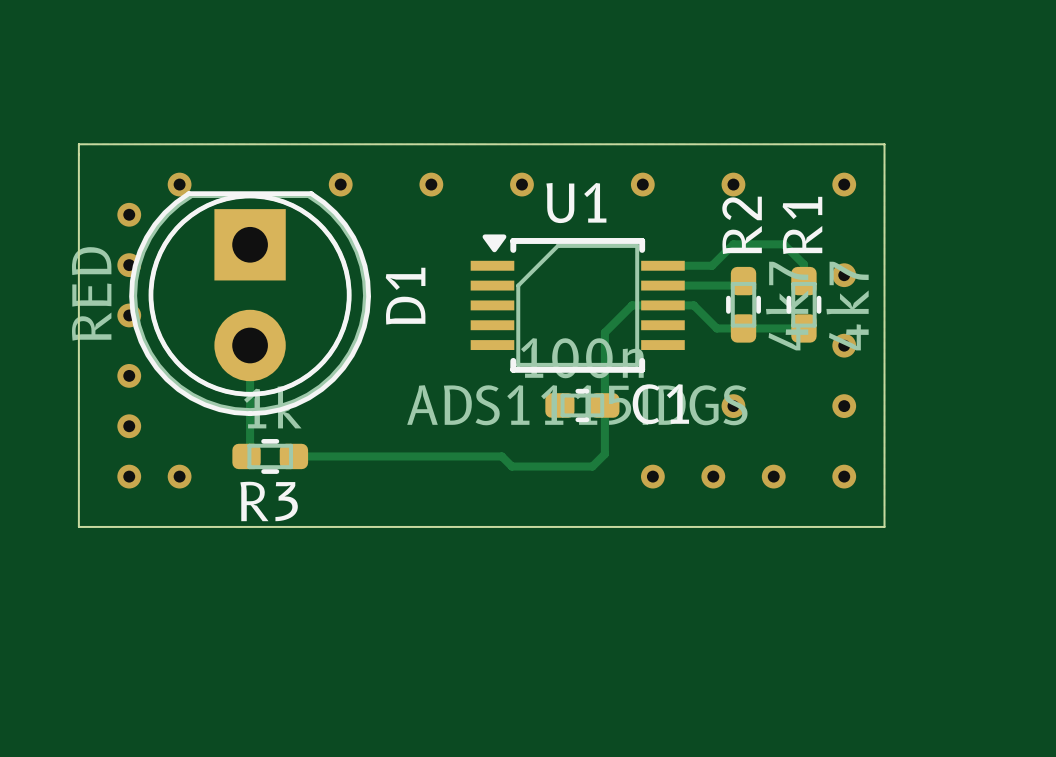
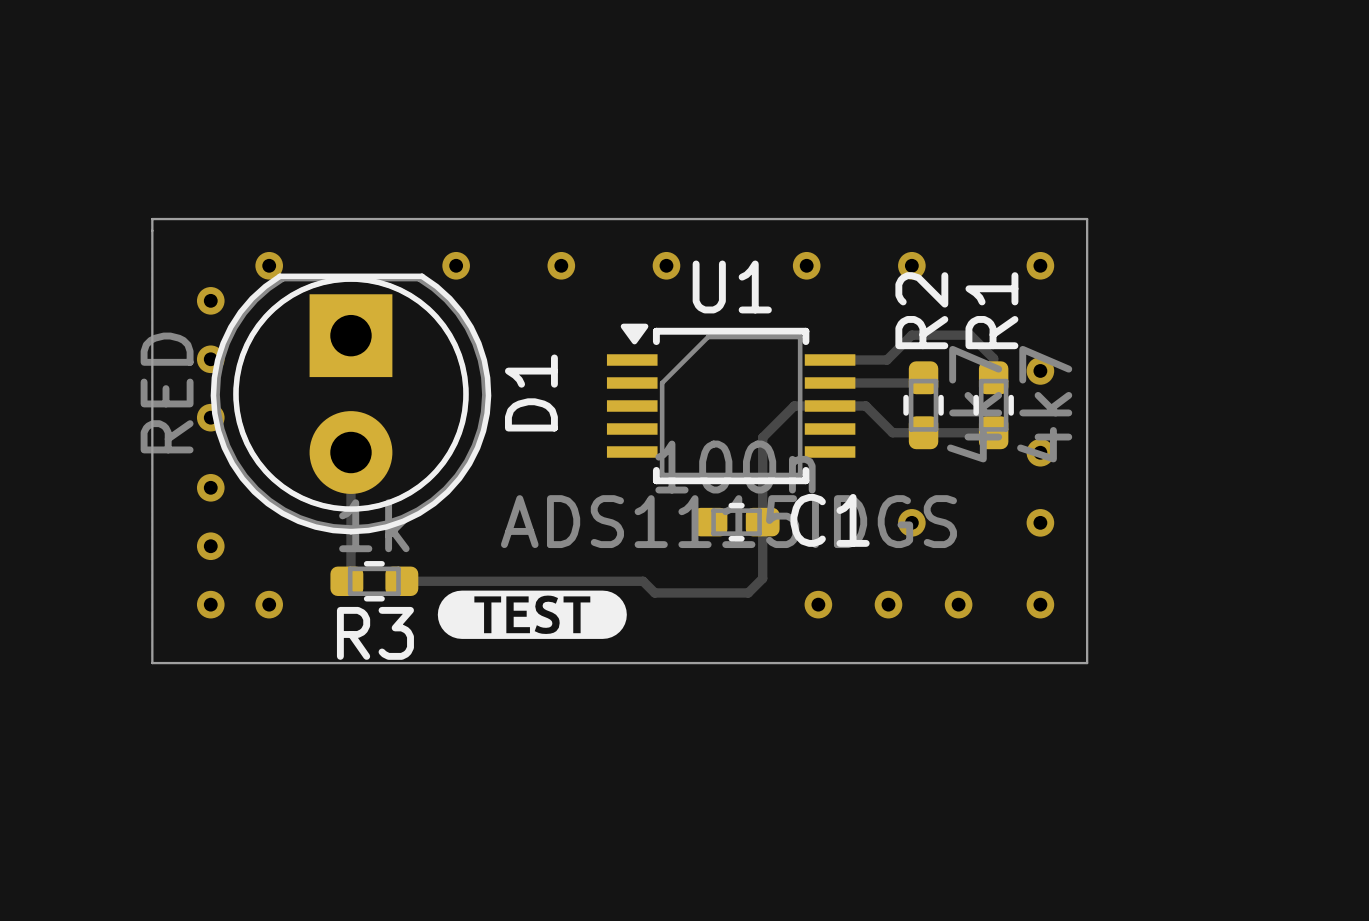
drawing: none -> [437, 590, 627, 639]

